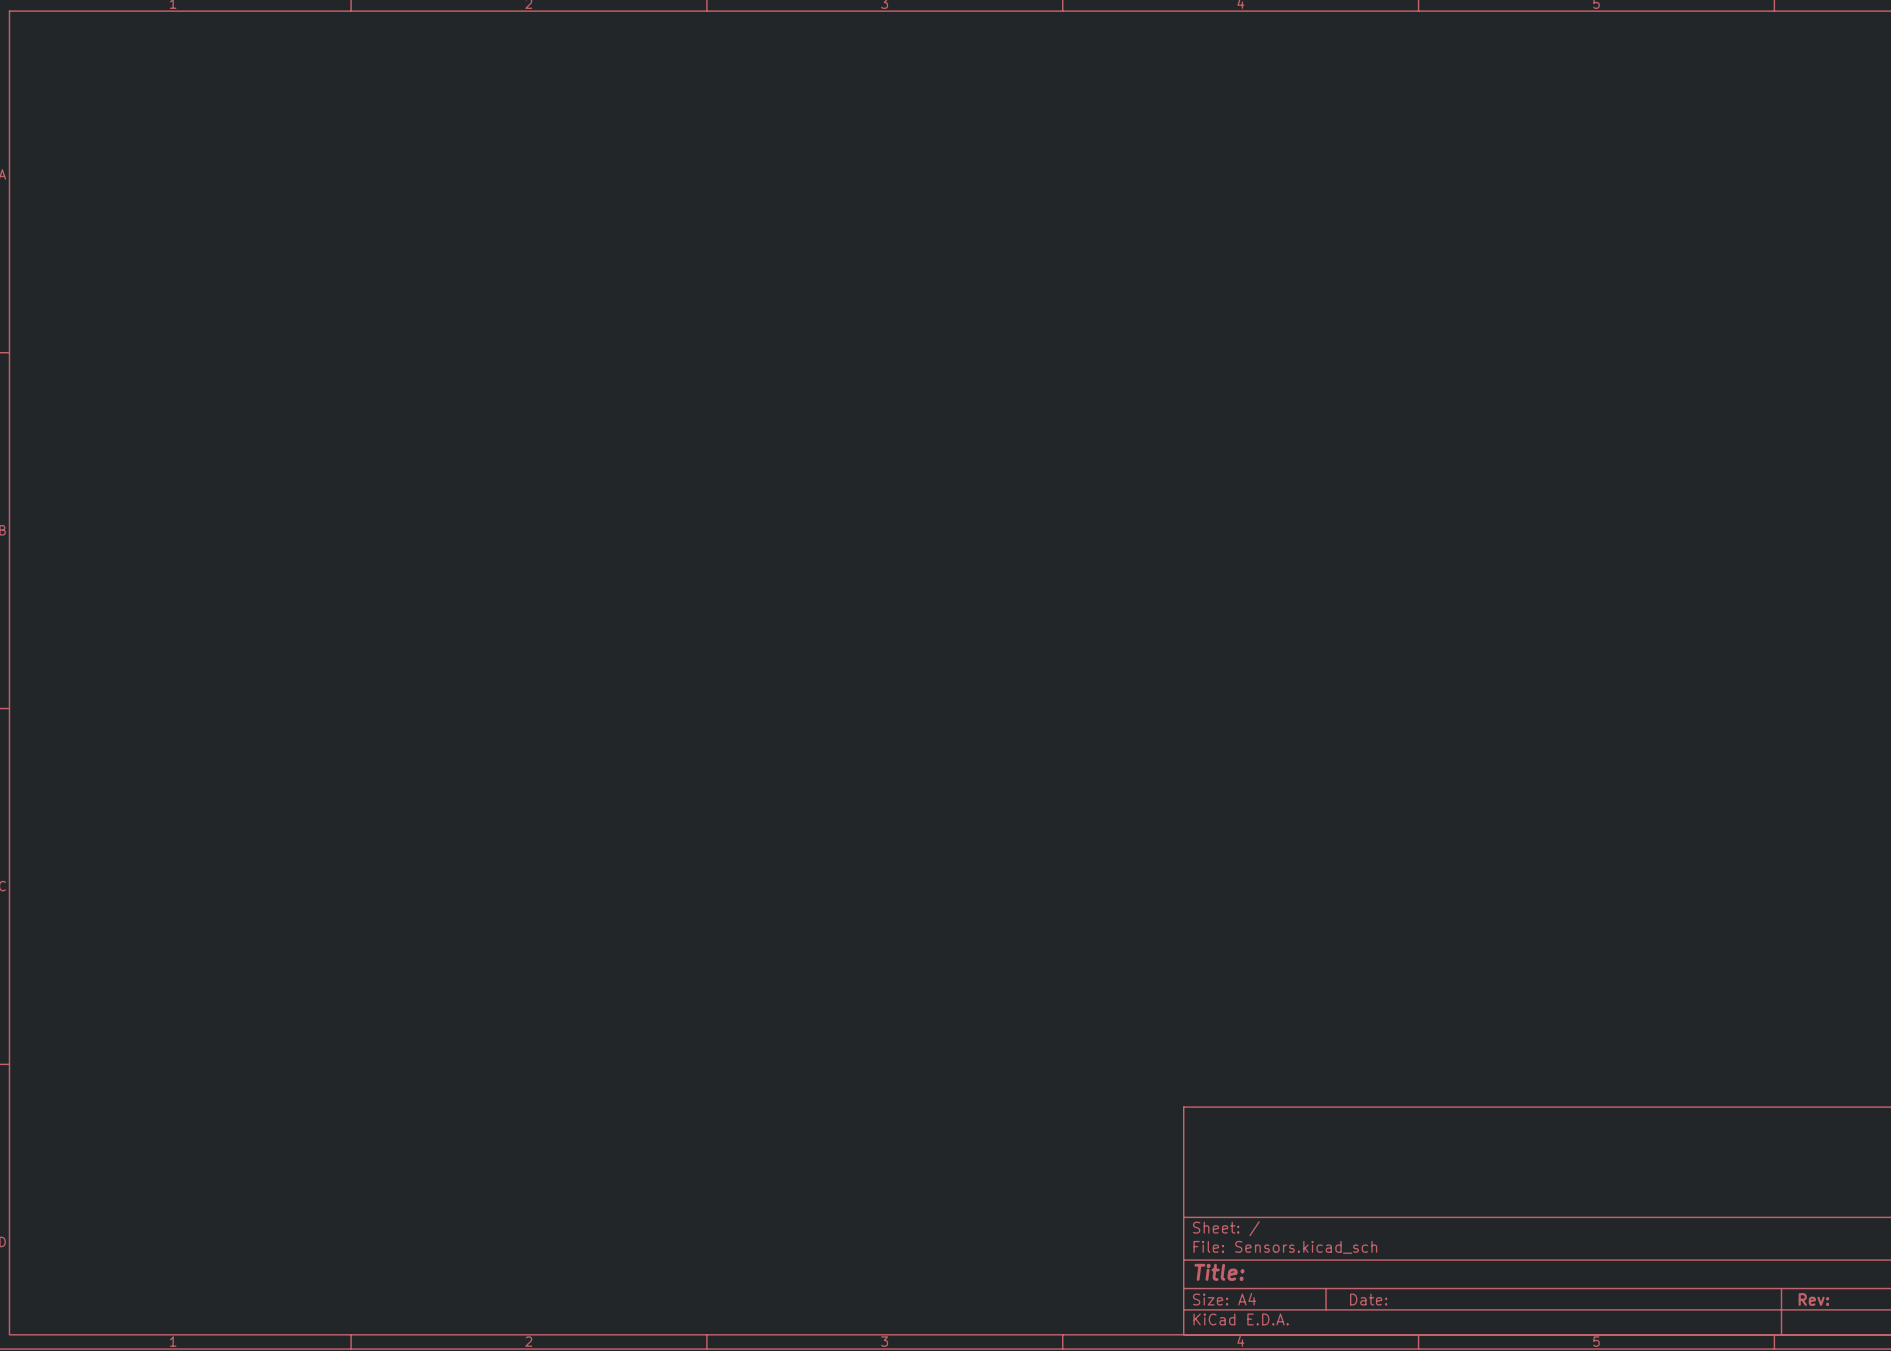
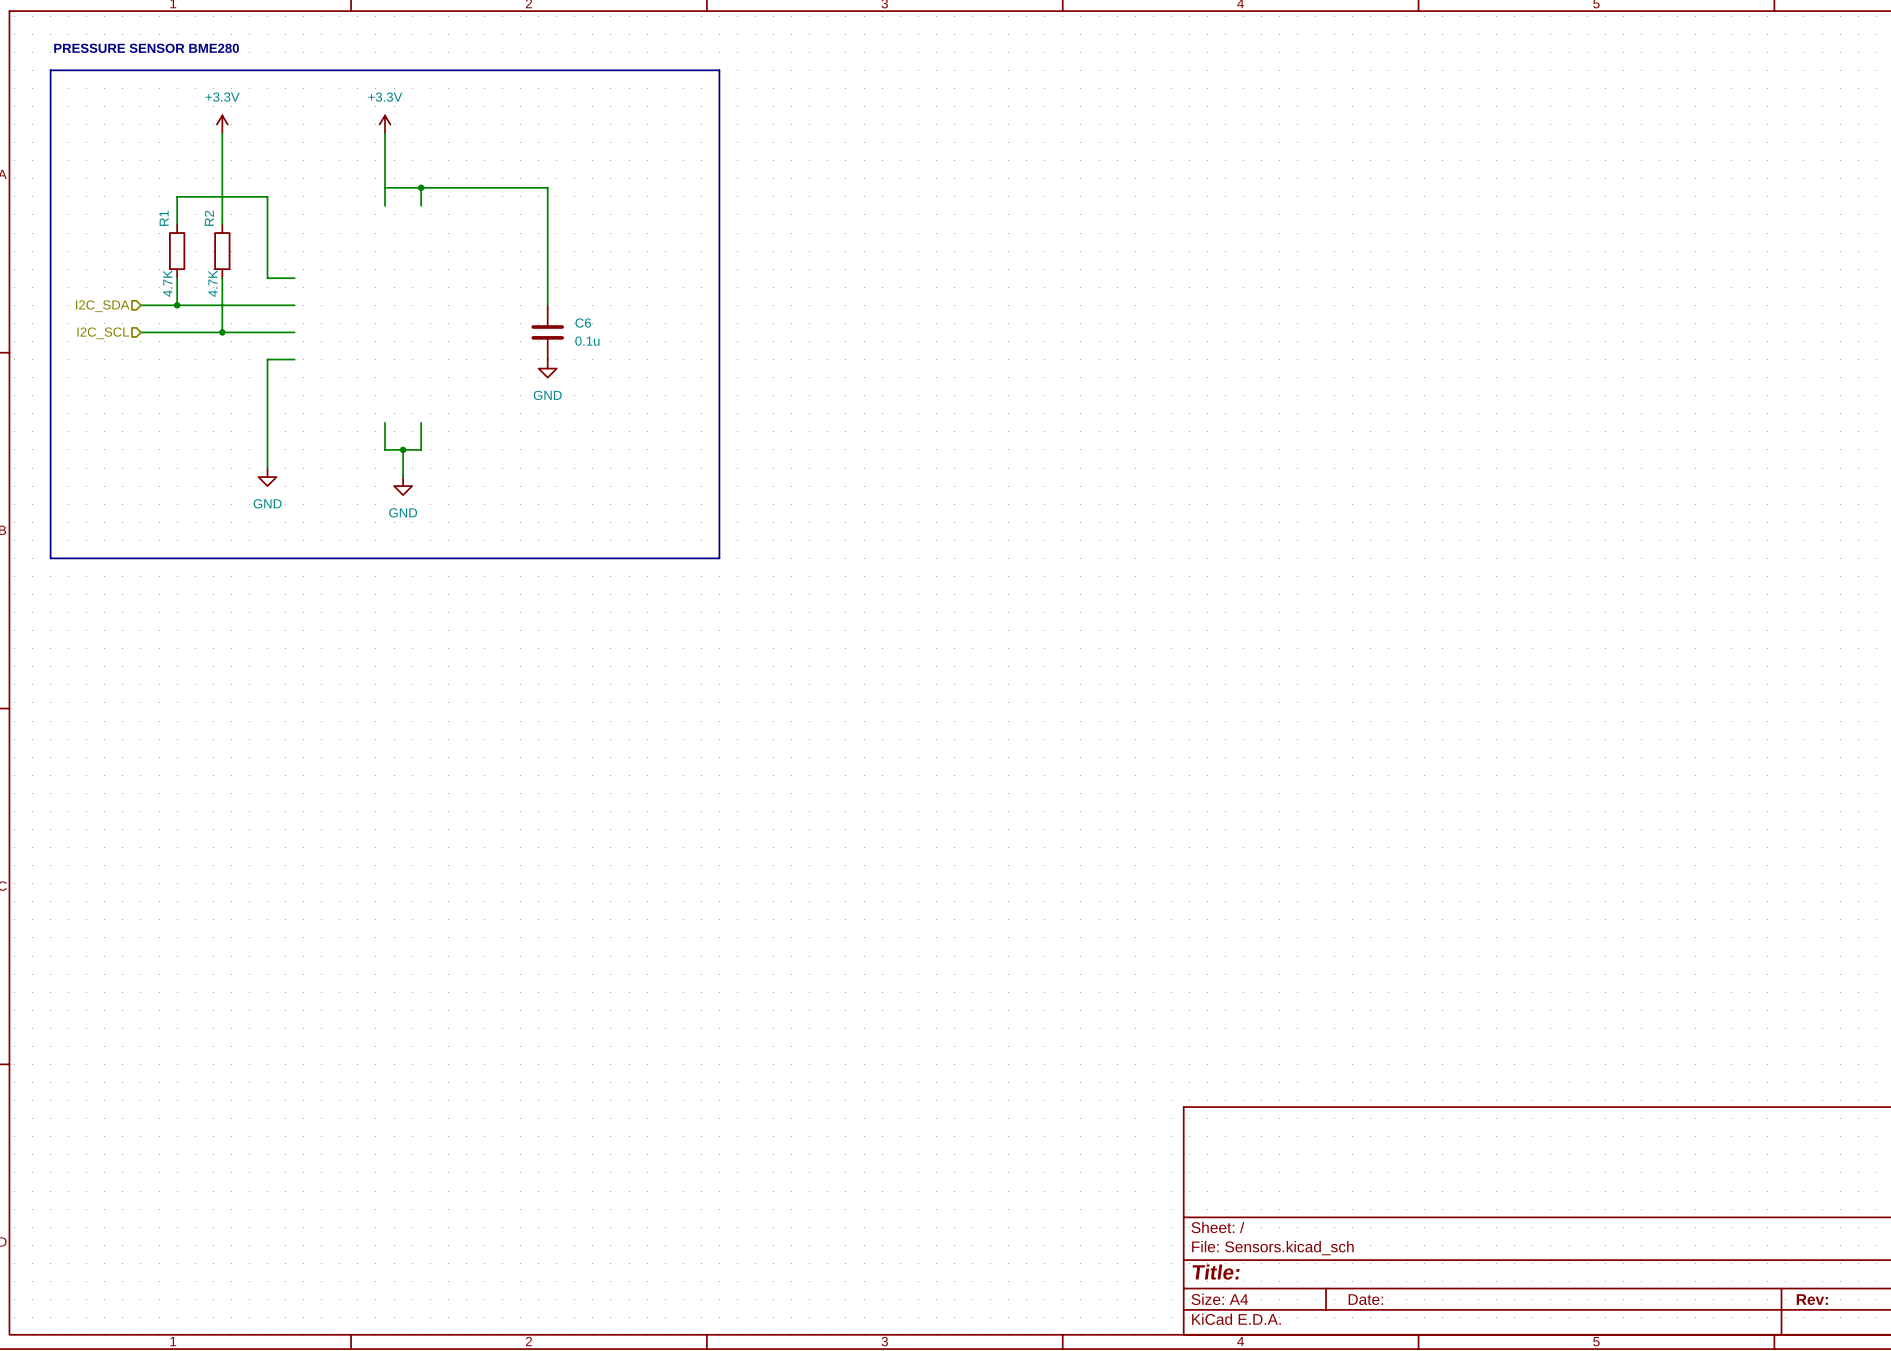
text: none -> PRESSURE SENSOR BME280 (146, 48)
line: none -> (50, 70) (719, 70) (719, 558) (50, 558) (50, 70)
power symbol: none -> +3.3V (222, 124)
power symbol: none -> +3.3V (385, 124)
wire: none -> (222, 133) (222, 223)
wire: none -> (385, 133) (385, 205)
wire: none -> (385, 187) (547, 187) (547, 305)
wire: none -> (421, 187) (421, 205)
junction: none -> (421, 187)
wire: none -> (177, 223) (177, 196) (267, 196) (267, 278) (294, 278)
R1: none -> 4.7K (177, 251)
R2: none -> 4.7K (222, 251)
wire: none -> (177, 278) (177, 305)
wire: none -> (222, 278) (222, 332)
hierarchical label: none -> I2C_SDA (102, 306)
wire: none -> (140, 305) (294, 305)
junction: none -> (177, 305)
hierarchical label: none -> I2C_SCL (103, 333)
wire: none -> (140, 332) (294, 332)
junction: none -> (222, 332)
C6: none -> 0.1u (547, 332)
wire: none -> (294, 359) (267, 359) (267, 468)
power symbol: none -> GND (547, 368)
wire: none -> (385, 422) (385, 449) (421, 449) (421, 422)
wire: none -> (403, 449) (403, 477)
junction: none -> (403, 449)
power symbol: none -> GND (267, 477)
power symbol: none -> GND (403, 486)

